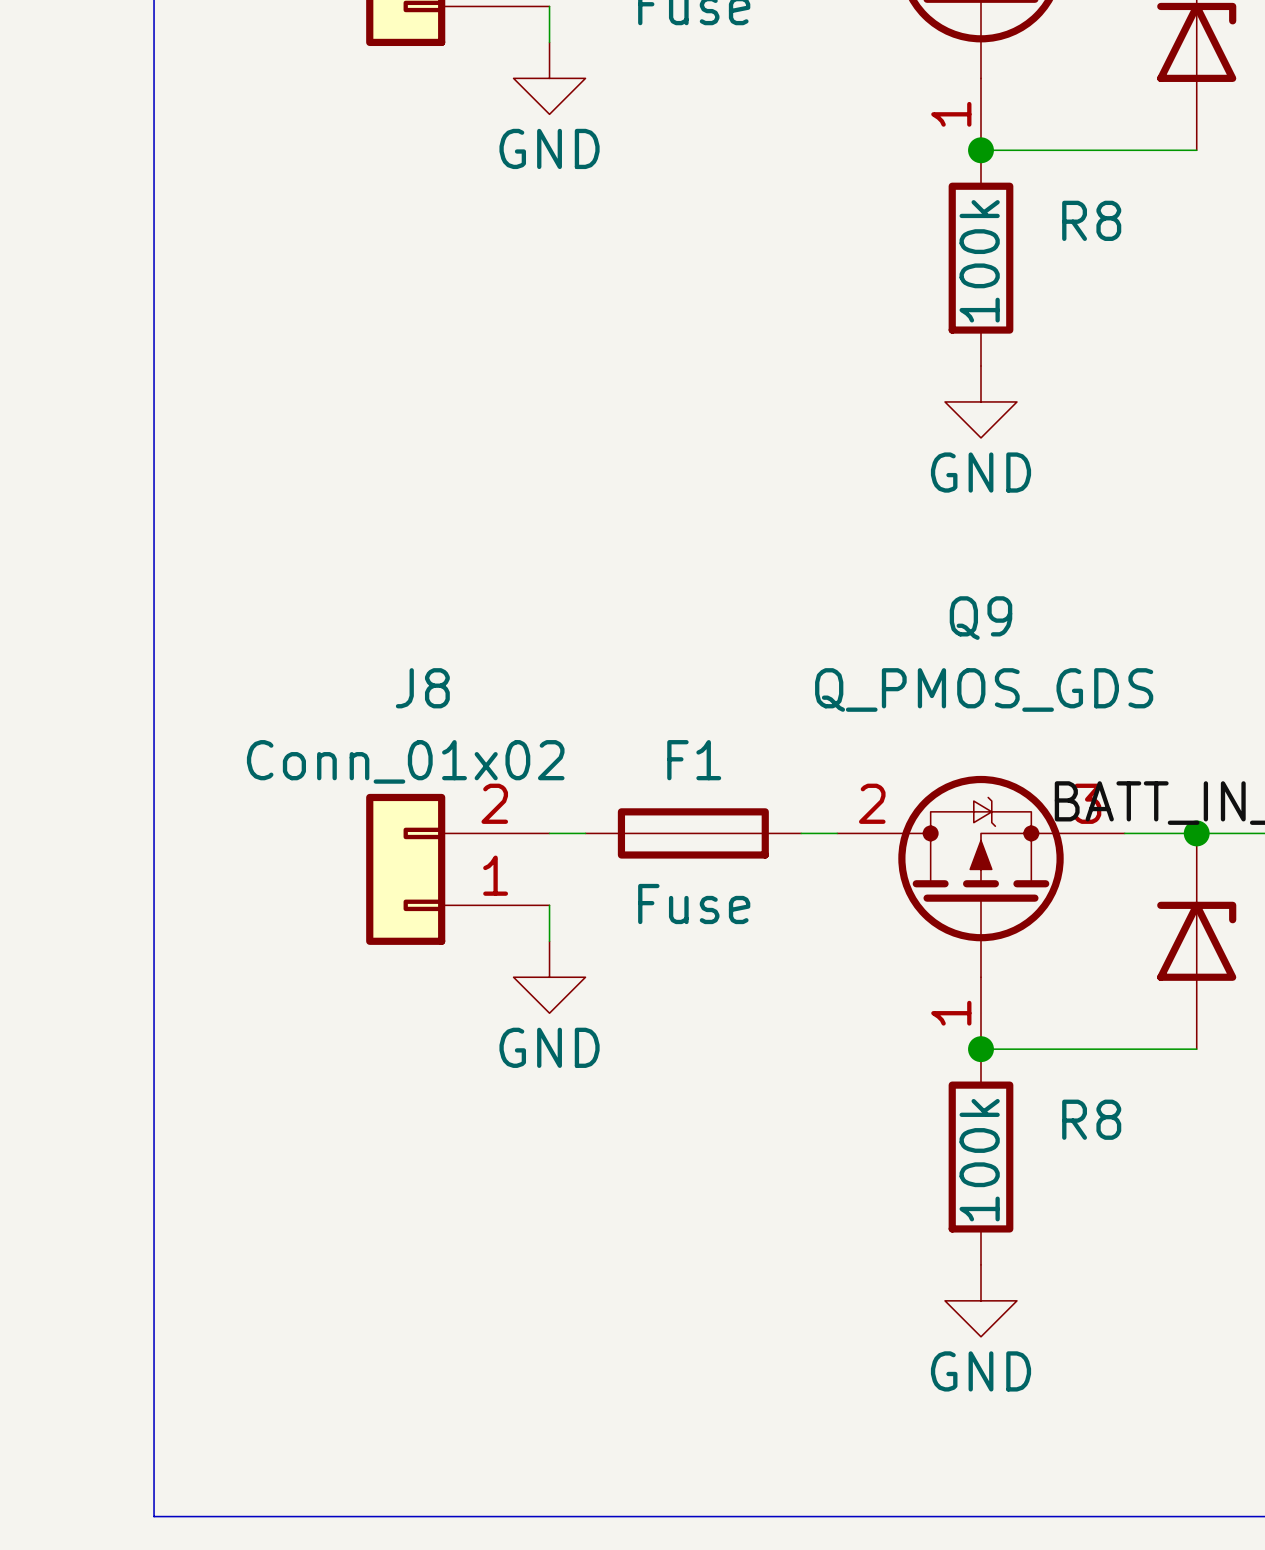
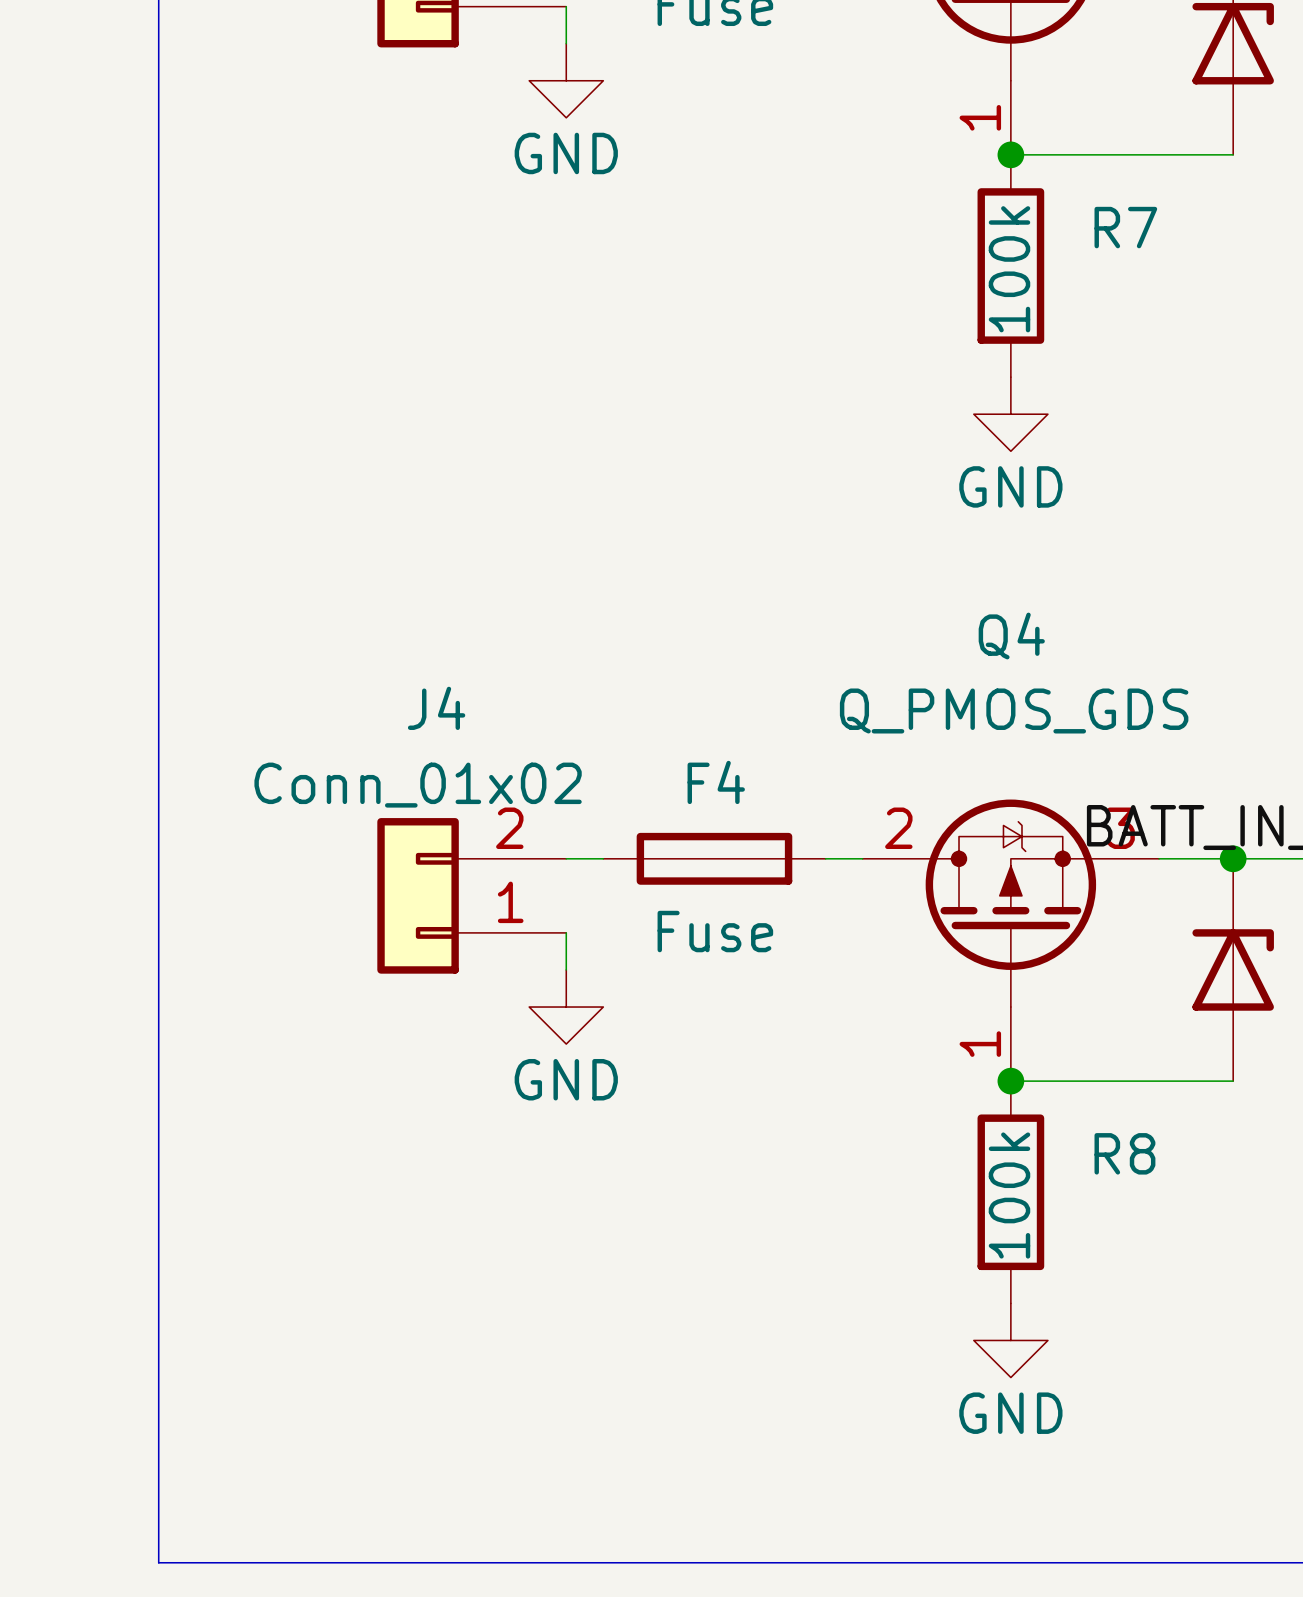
R8 name: R8 (1091, 220) -> R7 (1125, 227)
Q9 name: Q9 (980, 618) -> Q4 (1011, 636)
J8 name: J8 (422, 688) -> J4 (436, 708)
F1 name: F1 (694, 760) -> F4 (716, 782)

